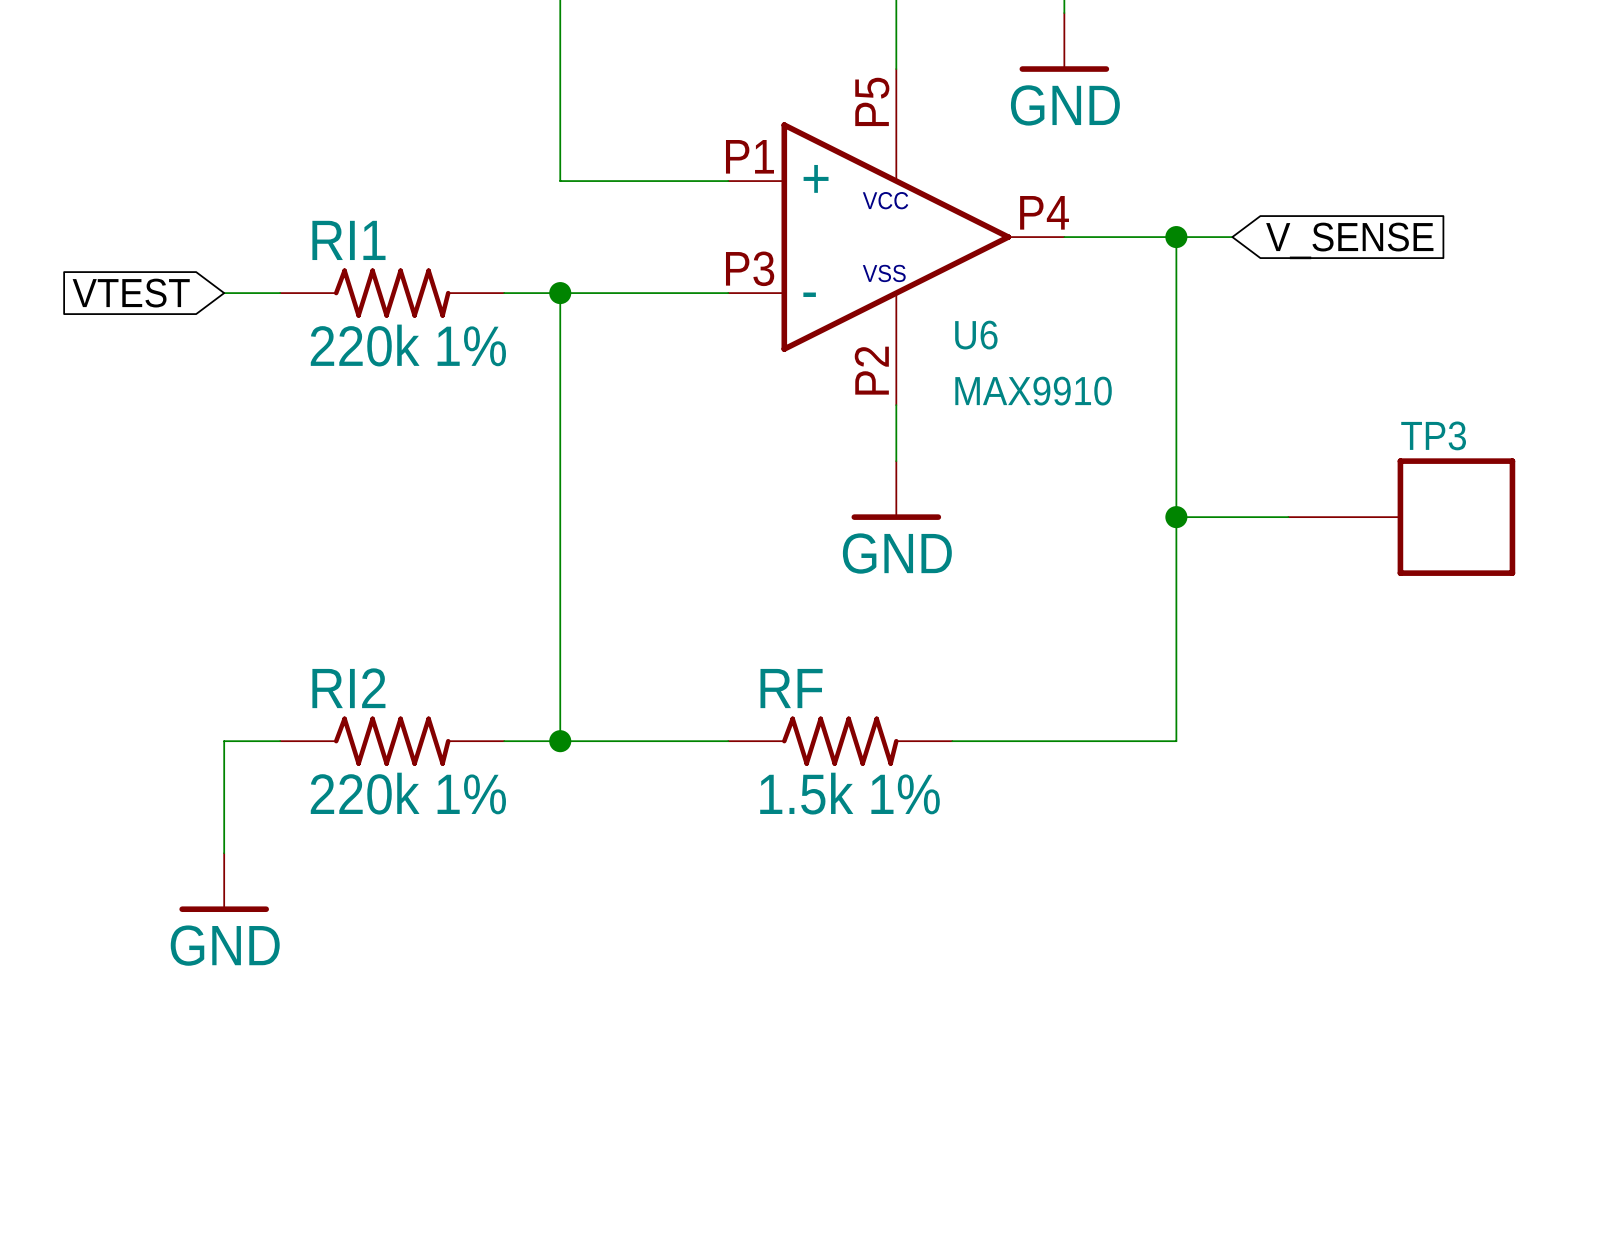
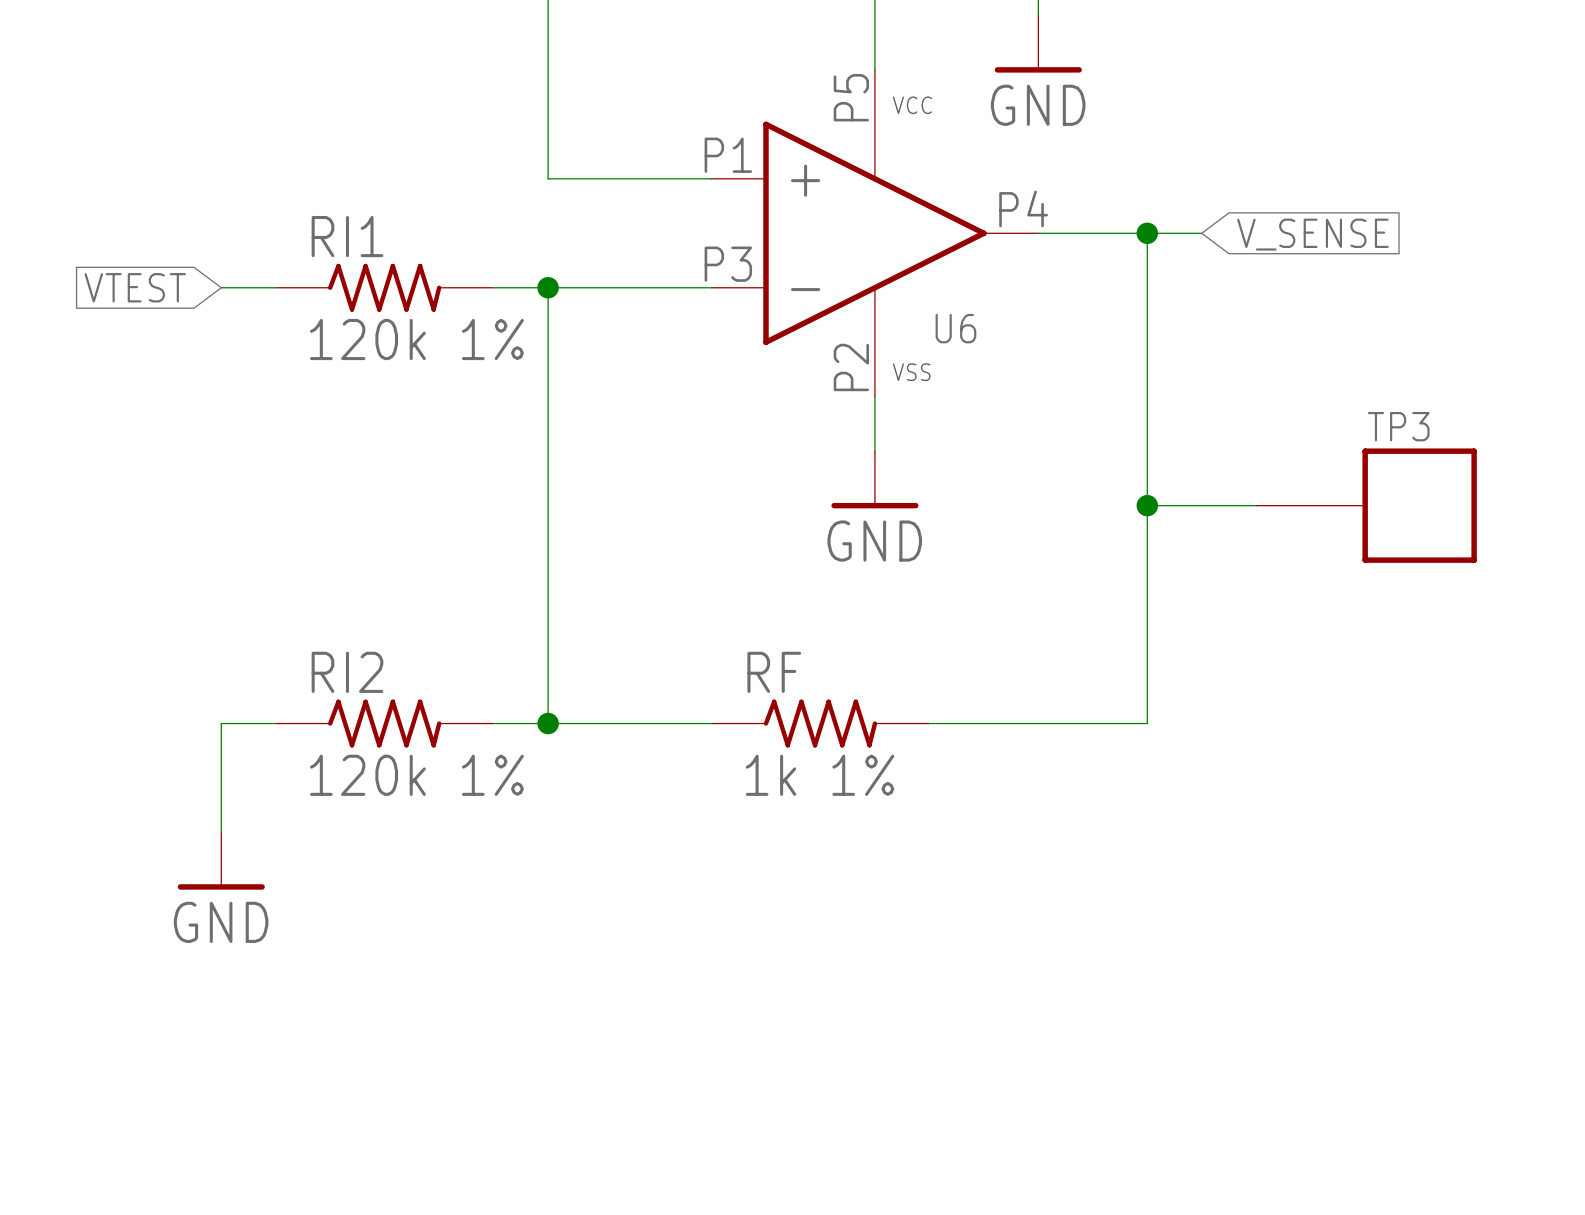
U6 text position: VCC (885, 200) -> VCC (912, 105)
U6 text position: VSS (884, 273) -> VSS (911, 372)
RI1 value: 220k 1% (408, 345) -> 120k 1% (416, 339)
U6 value: MAX9910 (1033, 391) -> none
RI2 value: 220k 1% (408, 793) -> 120k 1% (416, 775)
RF value: 1.5k 1% (850, 793) -> 1k 1% (820, 775)

